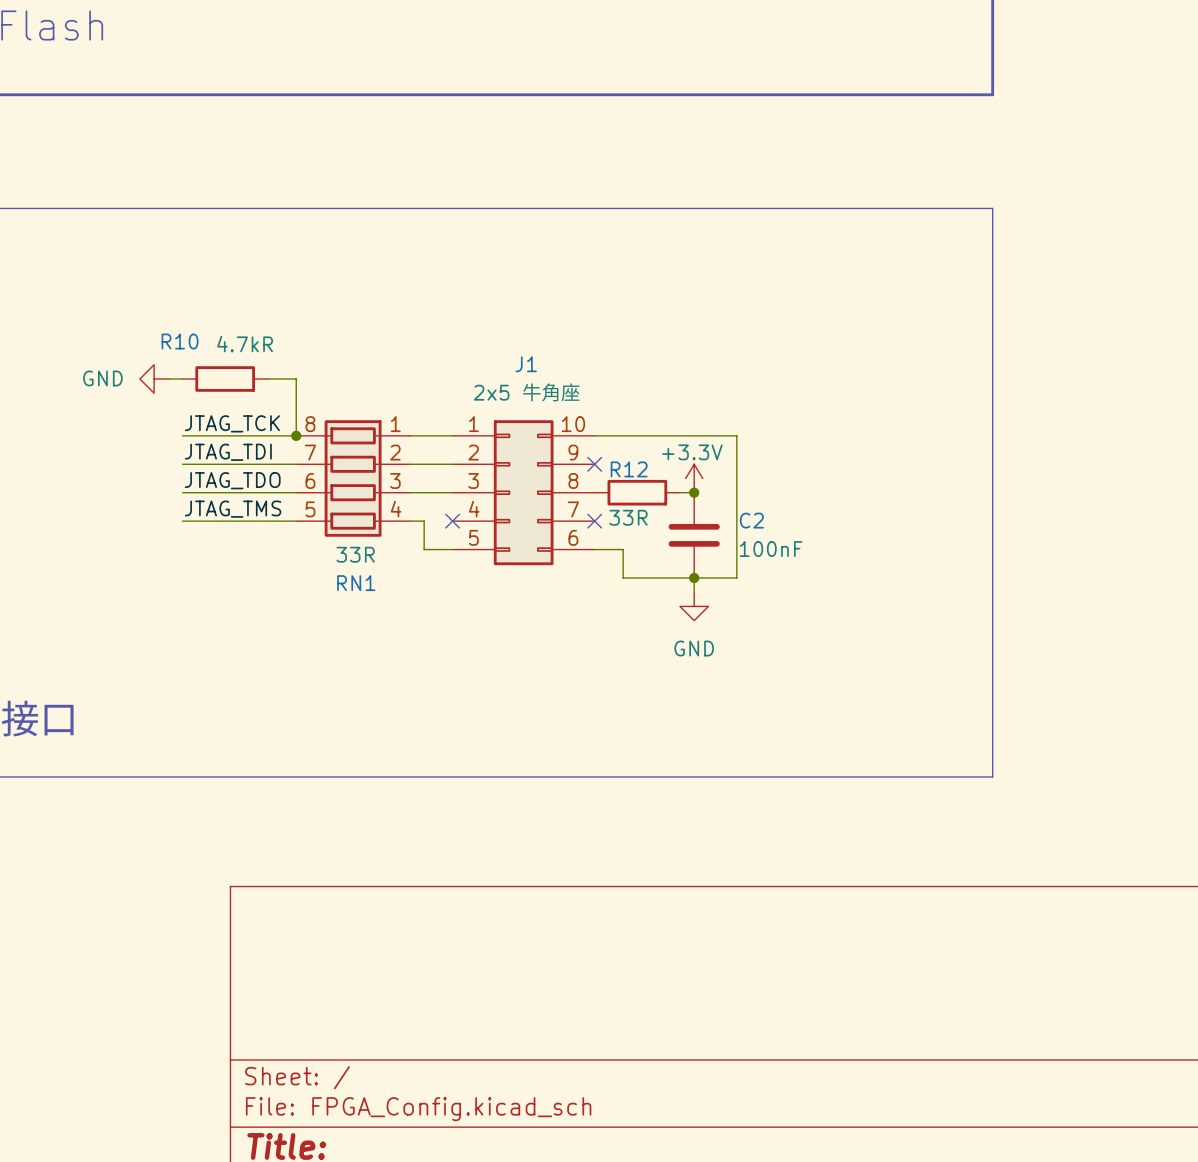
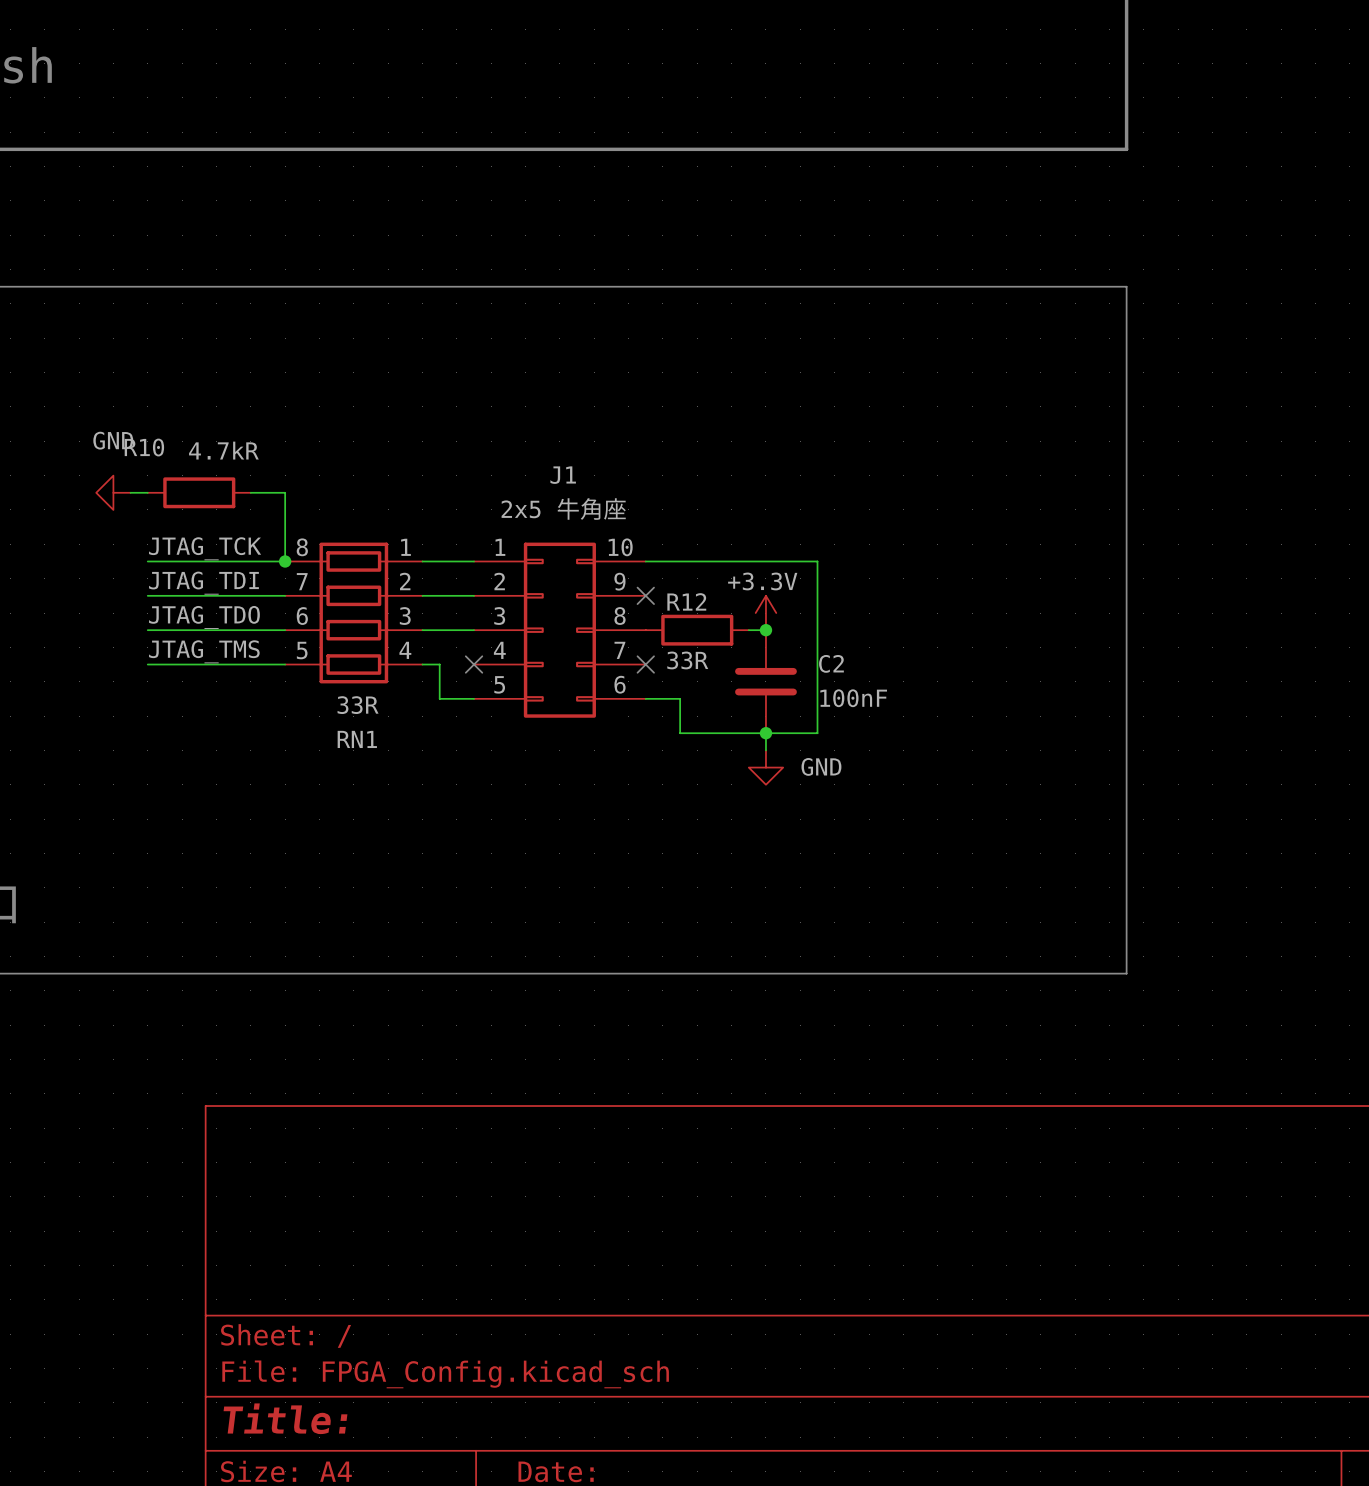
power symbol text position: GND (102, 378) -> GND (113, 440)
power symbol text position: GND (694, 648) -> GND (821, 766)

